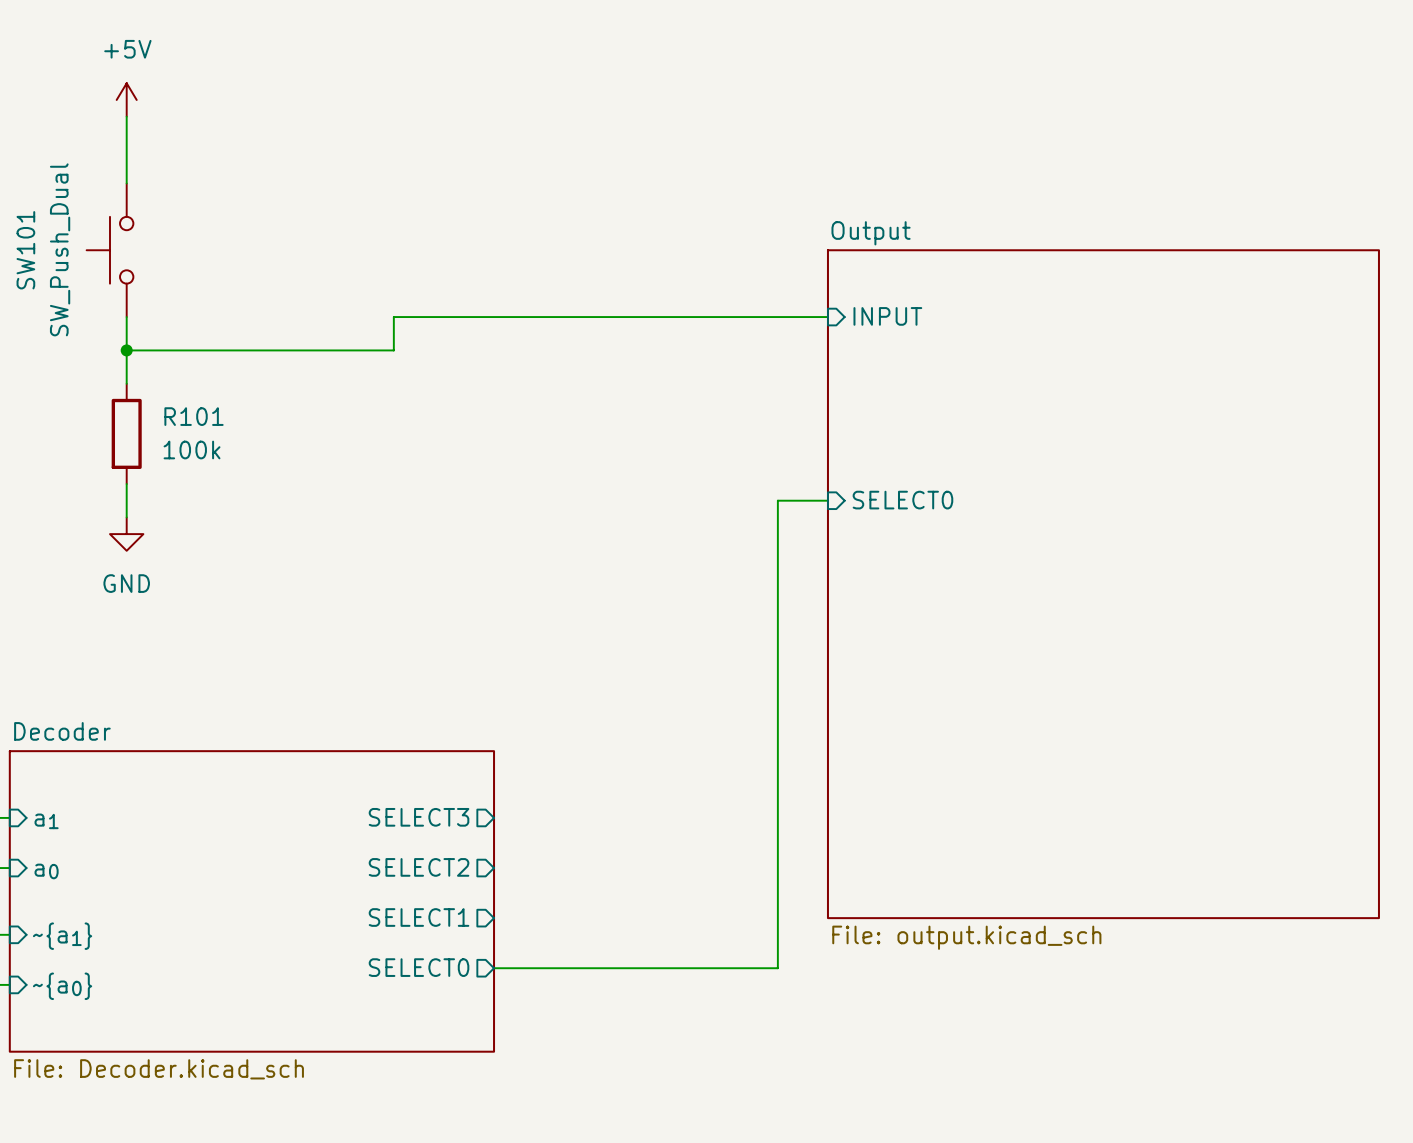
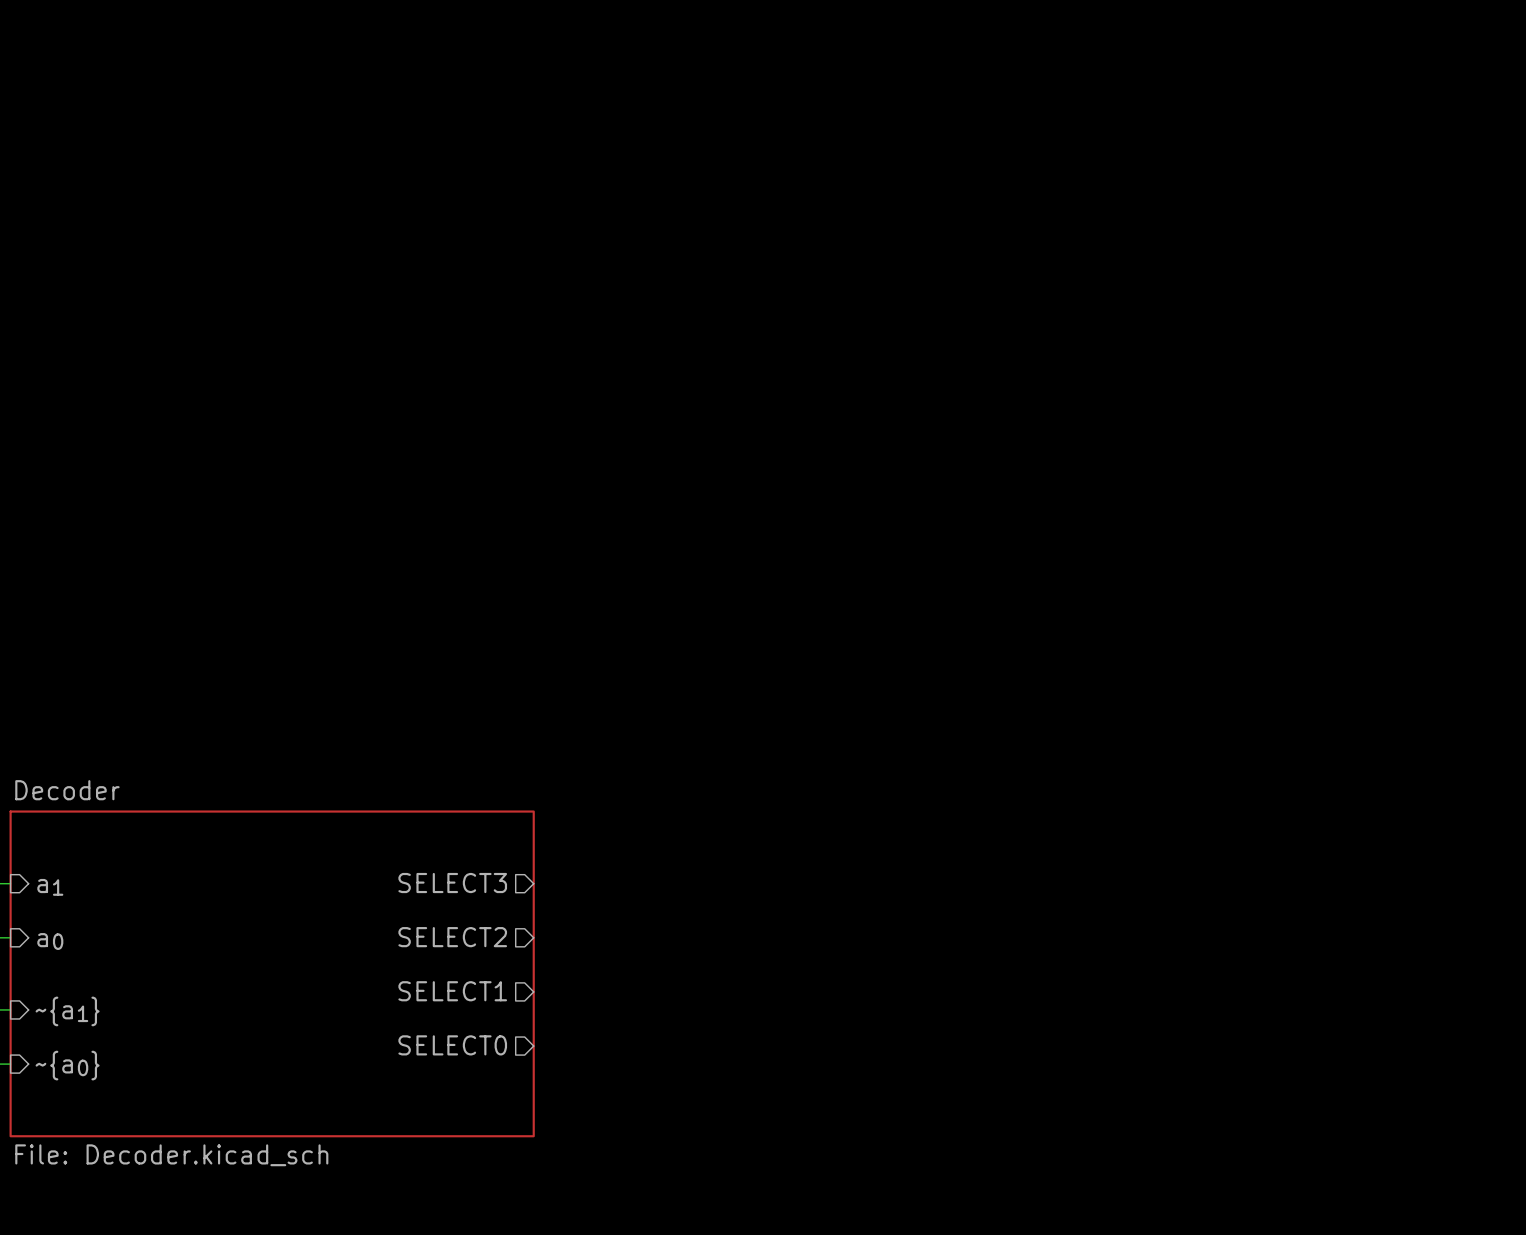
power symbol: +5V (126, 99) -> none
wire: (126, 116) (126, 183) -> none
SW101: SW_Push_Dual (110, 250) -> none
sheet pin: INPUT (887, 316) -> none
wire: (126, 317) (126, 383) -> none
wire: (827, 317) (393, 317) (393, 350) (126, 350) -> none
junction: (126, 350) -> none
R101: 100k (126, 433) -> none
wire: (126, 484) (126, 517) -> none
wire: (827, 500) (777, 500) (777, 968) (494, 968) -> none
sheet pin: SELECT0 (902, 500) -> none
power symbol: GND (126, 534) -> none
sheet Output: File: output.kicad_sch (1103, 584) -> none

